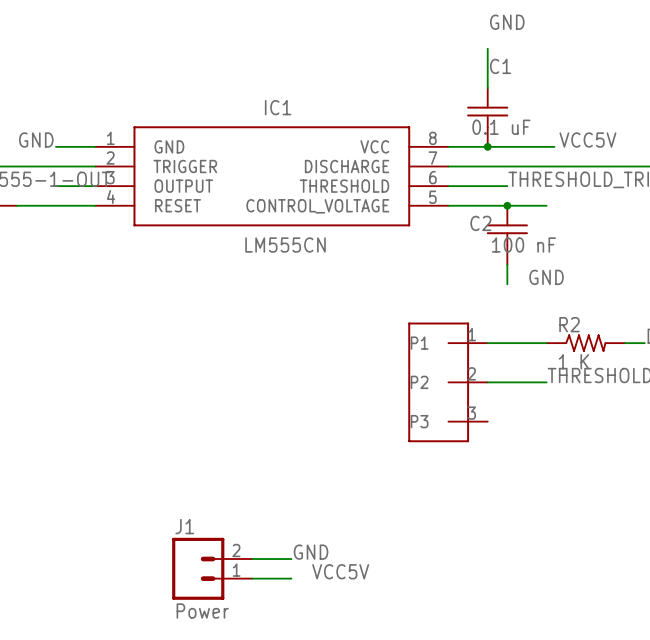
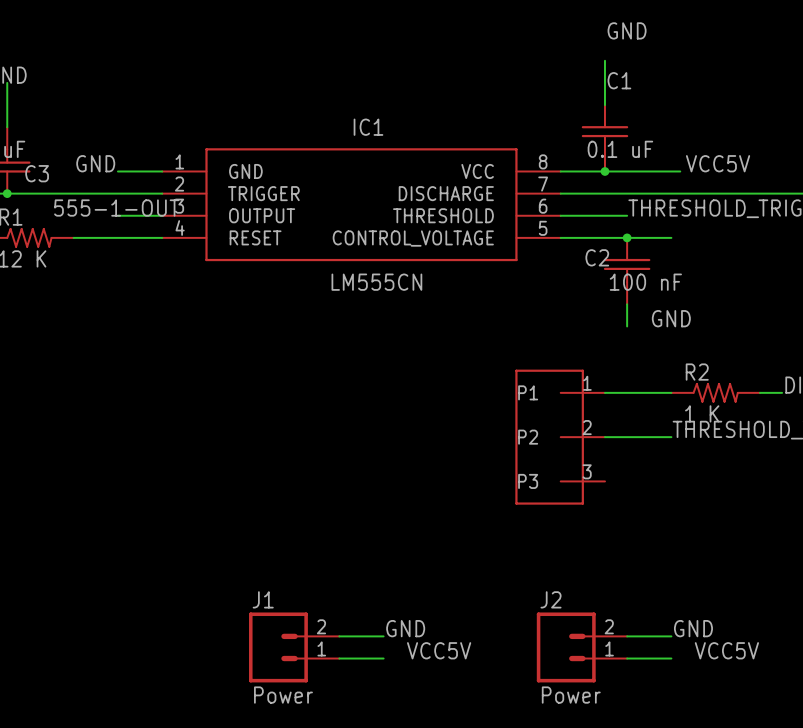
label: none -> GND (693, 628)
wire: none -> (627, 636) (671, 636)
J2: none -> Power (581, 647)
label: none -> VCC5V (726, 650)
wire: none -> (627, 658) (671, 658)

